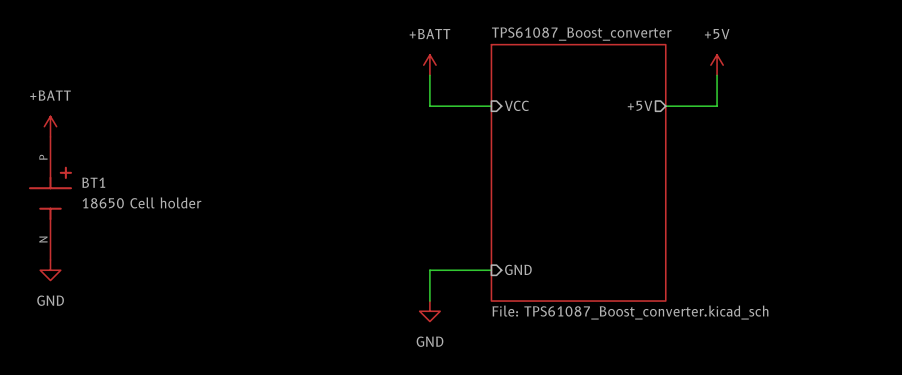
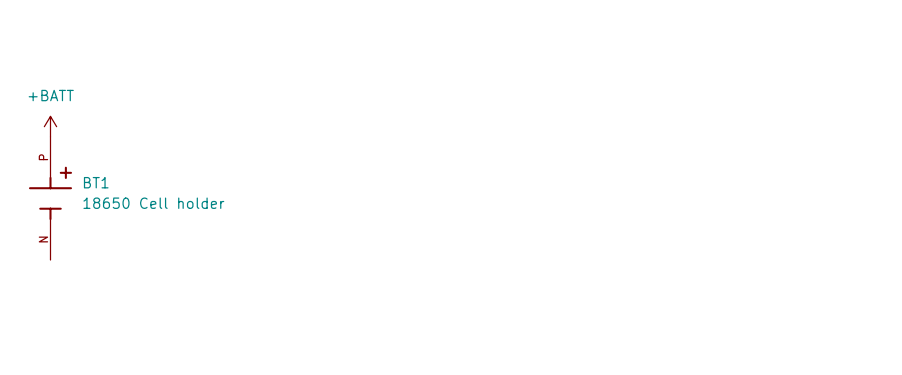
power symbol: +BATT (429, 65) -> none
power symbol: +5V (717, 65) -> none
wire: (429, 75) (429, 106) (491, 106) -> none
wire: (717, 75) (717, 106) (665, 106) -> none
sheet pin: VCC (516, 105) -> none
sheet pin: +5V (640, 105) -> none
sheet TPS61087_Boost_converter: File: TPS61087_Boost_converter.kicad_sch (578, 172) -> none
sheet pin: GND (518, 269) -> none
power symbol: GND (50, 270) -> none
wire: (491, 270) (429, 270) (429, 301) -> none
power symbol: GND (429, 311) -> none

